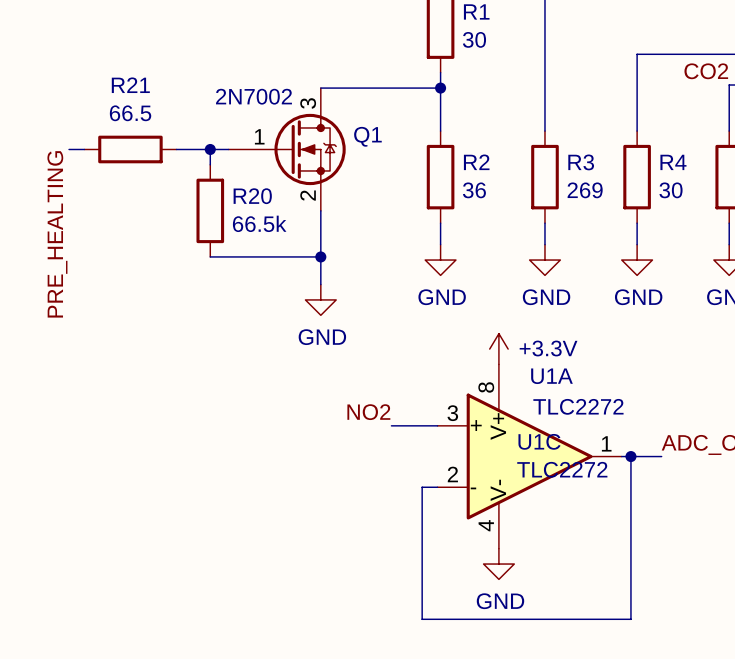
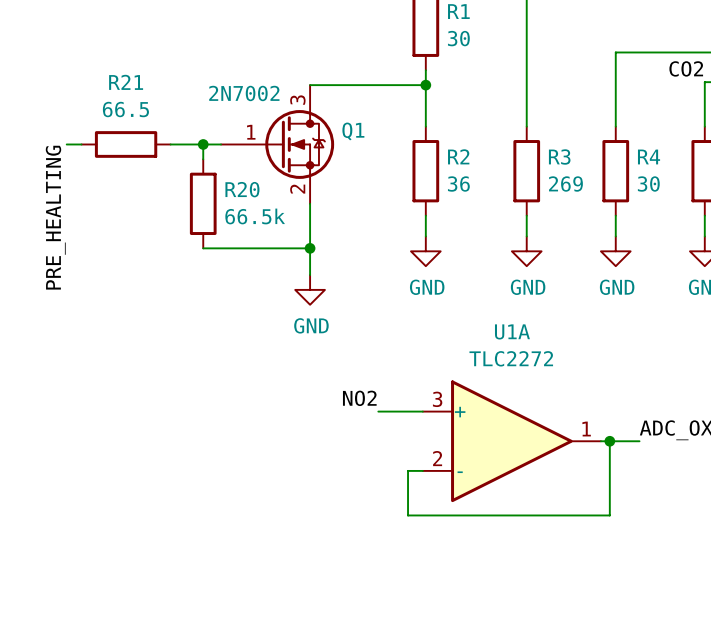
power symbol: +3.3V (498, 349) -> none
U1A name position: U1A (551, 376) -> U1A (512, 331)
U1A value position: TLC2272 (578, 406) -> TLC2272 (511, 358)
U1C: TLC2272 (498, 456) -> none
wire: (422, 533) (422, 619) (630, 619) (630, 533) -> (408, 515) (609, 515)
power symbol: GND (498, 564) -> none

